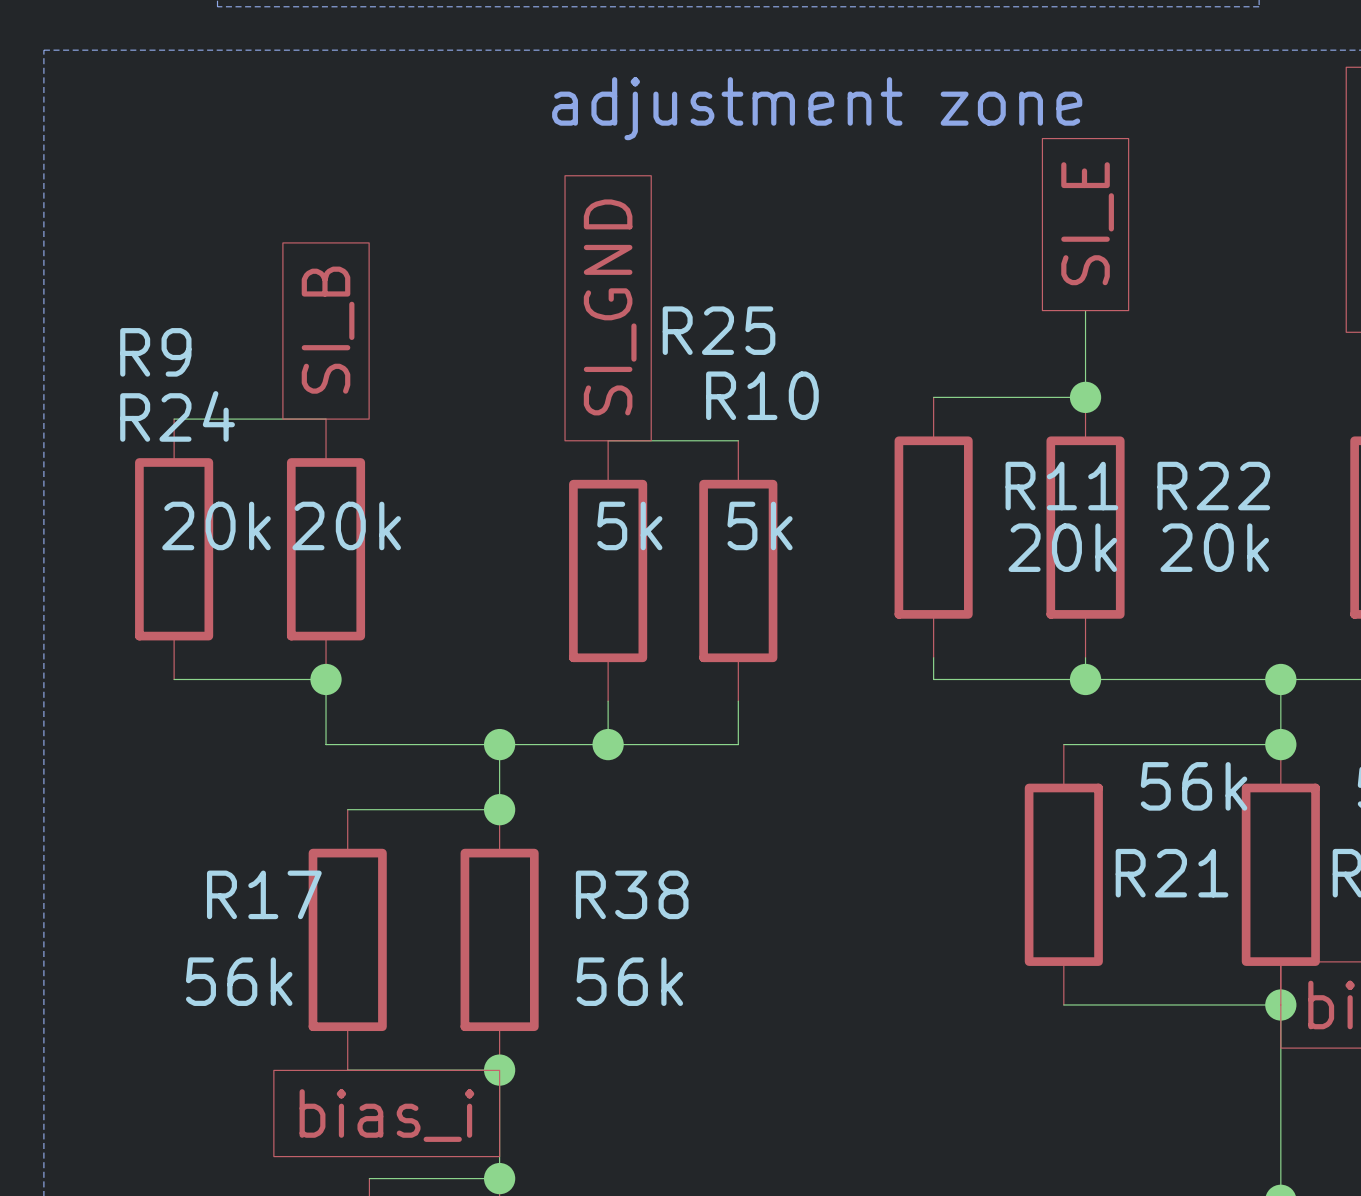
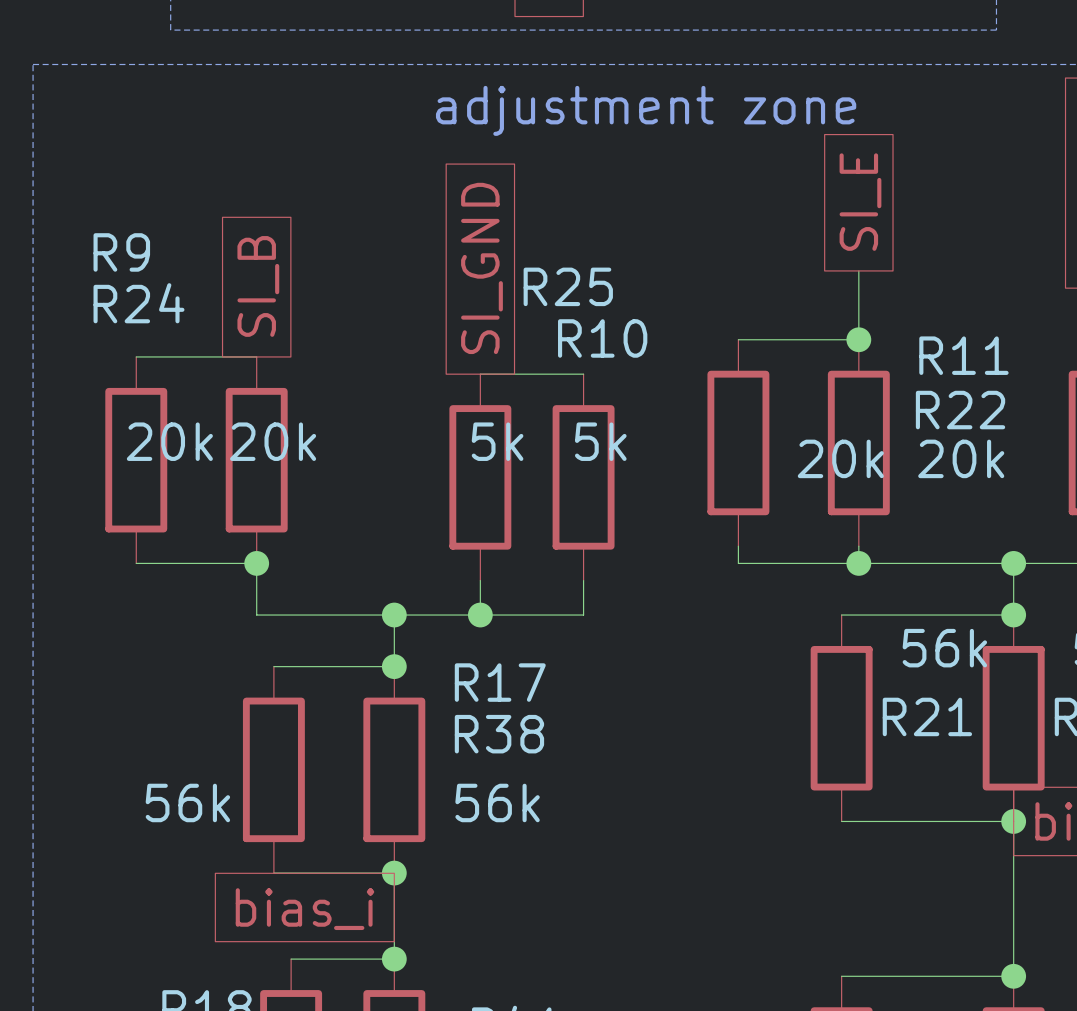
R9 name position: R9 (155, 352) -> R9 (121, 252)
R24 name position: R24 (177, 416) -> R24 (138, 303)
R11 name position: R11 (1061, 486) -> R11 (963, 355)
R17 name position: R17 (264, 894) -> R17 (500, 682)

